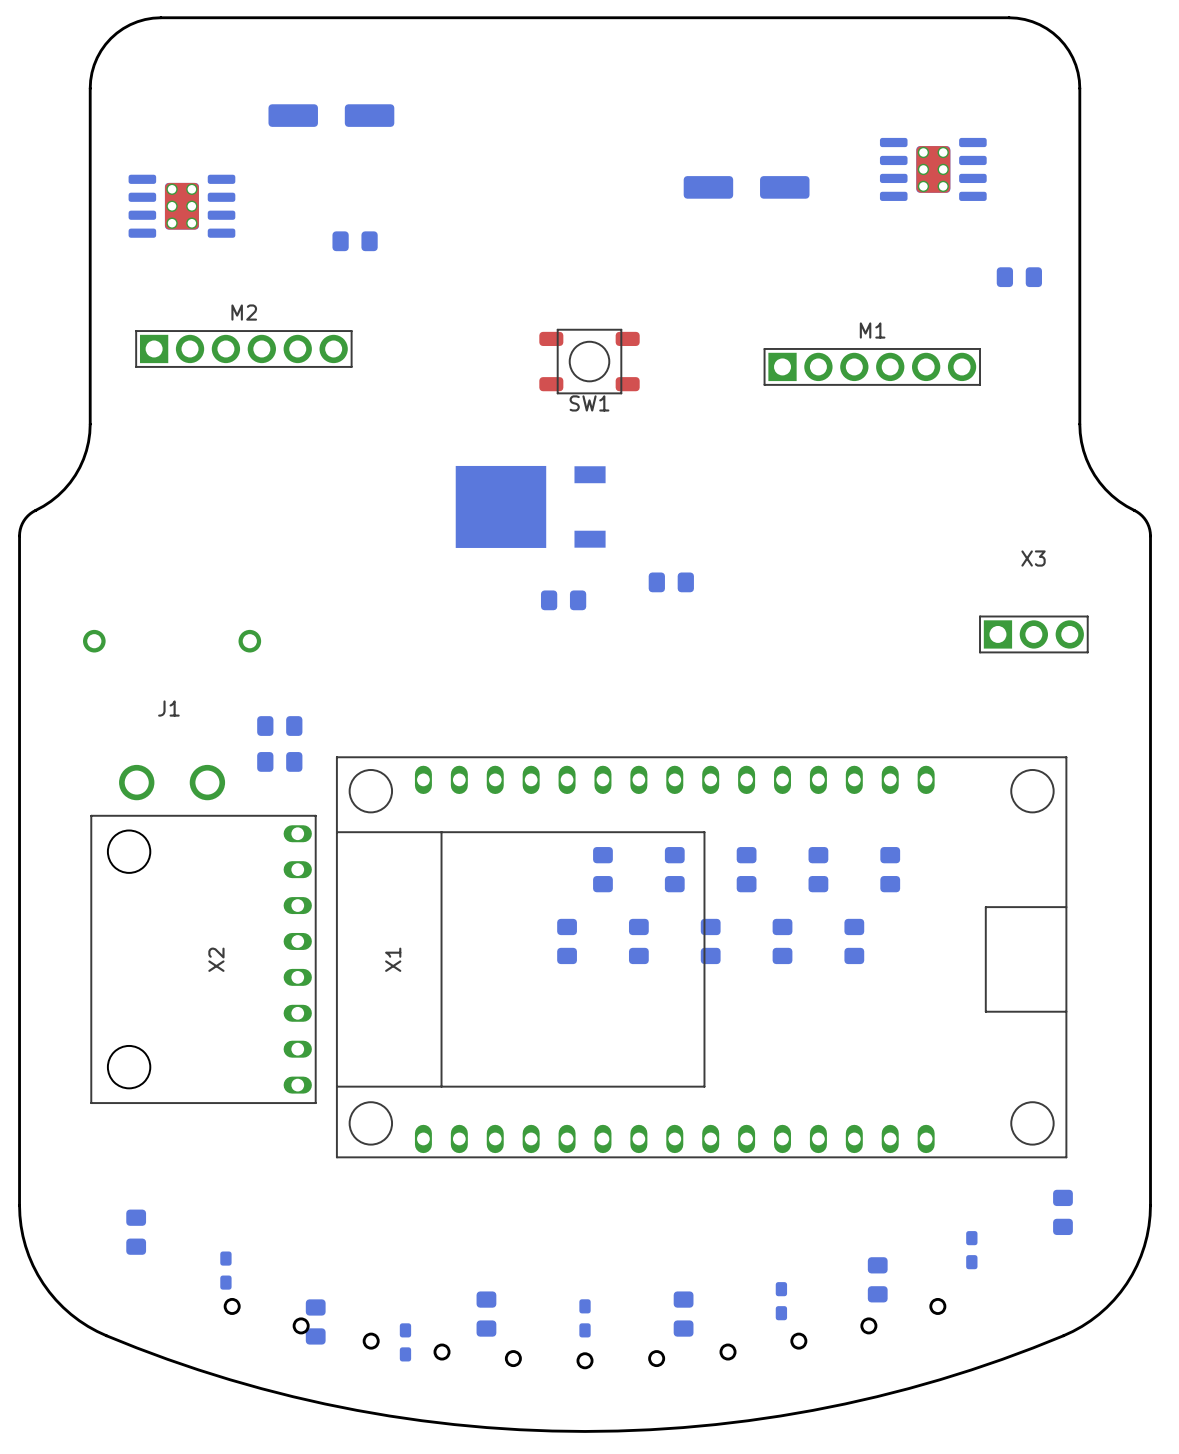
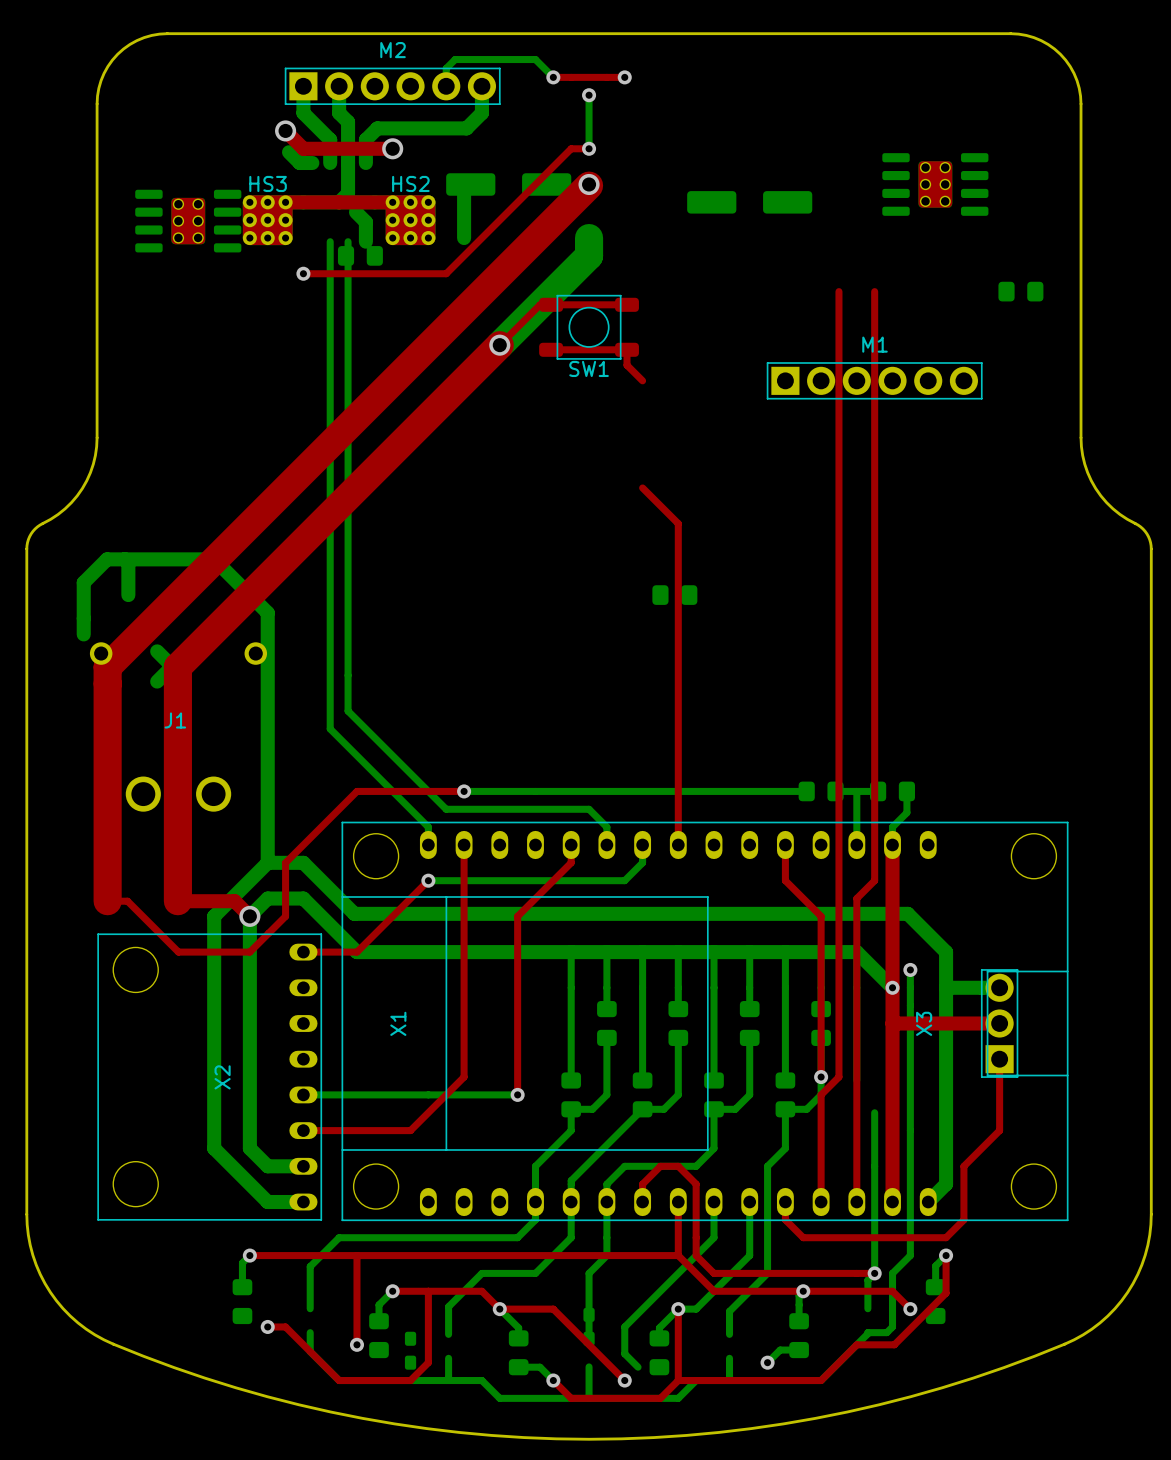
top track: none -> (553, 77) (624, 77)
bottom track: none -> (553, 77) (535, 59) (455, 59) (446, 68) (446, 86)
via: none -> (553, 77)
via: none -> (624, 77)
bottom track: none -> (303, 95) (303, 113) (330, 139) (330, 162)
bottom track: none -> (339, 95) (339, 113) (348, 122) (348, 193) (339, 202)
bottom track: none -> (481, 95) (481, 113) (466, 128) (377, 128) (365, 139) (365, 162)
bottom track: none -> (589, 95) (589, 148)
via: none -> (589, 95)
top track: none -> (285, 130) (303, 148) (392, 148)
via: none -> (285, 130)
part position: (331, 115) -> (508, 184)
via: none -> (392, 148)
top track: none -> (589, 148) (571, 148) (446, 273) (303, 273)
via: none -> (589, 148)
bottom track: none -> (289, 152) (299, 162) (312, 162)
bottom track: none -> (470, 184) (464, 191) (464, 238)
top track: none -> (589, 184) (107, 667) (107, 901) (127, 901) (178, 952) (249, 952) (285, 916) (285, 862) (356, 791) (464, 791)
via: none -> (589, 184)
top track: none -> (285, 202) (392, 202)
bottom track: none -> (356, 212) (365, 222) (365, 241)
HS3: none -> (267, 220)
HS2: none -> (410, 220)
bottom track: none -> (589, 238) (589, 255) (499, 345)
bottom track: none -> (330, 241) (330, 728) (428, 827) (428, 844)
bottom track: none -> (348, 241) (348, 711) (446, 809) (589, 809) (606, 827) (606, 844)
via: none -> (303, 273)
top track: none -> (838, 291) (838, 1077) (821, 1094) (821, 1202)
top track: none -> (874, 291) (874, 880) (856, 898) (856, 1202)
top track: none -> (627, 304) (540, 304) (177, 667) (177, 901) (234, 901) (249, 916)
via: none -> (499, 345)
top track: none -> (551, 349) (627, 349) (627, 365) (642, 380)
M2 position: (243, 348) -> (392, 86)
SW1 position: (589, 361) -> (589, 327)
top track: none -> (642, 487) (678, 523) (678, 844)
part: (530, 506) -> none
bottom track: none -> (124, 559) (128, 562) (128, 595)
part: (563, 600) -> none
bottom track: none -> (83, 634) (83, 582) (107, 559) (214, 559) (267, 612) (267, 862)
X3 rotation: 0° (1033, 634) -> 90° counterclockwise (999, 1023)
X3 position: (1033, 634) -> (999, 1023)
bottom track: none -> (157, 651) (177, 672)
bottom track: none -> (172, 666) (157, 681)
part: (279, 726) -> none
X1 footprint: [336, 756, 1068, 1159] -> [341, 821, 1069, 1222]
part: (279, 761) -> none
bottom track: none -> (464, 791) (806, 791)
via: none -> (464, 791)
part: none -> (821, 791)
bottom track: none -> (835, 791) (878, 791)
bottom track: none -> (856, 791) (856, 844)
part: none -> (892, 791)
bottom track: none -> (906, 791) (906, 812) (892, 827) (892, 844)
X2 footprint: [90, 814, 317, 1104] -> [97, 933, 323, 1221]
top track: none -> (464, 844) (464, 1077) (410, 1130) (303, 1130)
bottom track: none -> (642, 844) (642, 862) (624, 880) (428, 880)
top track: none -> (785, 844) (785, 880) (821, 916) (821, 1077)
top track: none -> (892, 844) (892, 1202)
top track: none -> (571, 845) (571, 862) (517, 916) (517, 1094)
bottom track: none -> (267, 862) (214, 916) (214, 1148) (267, 1202) (303, 1202)
bottom track: none -> (267, 862) (303, 862) (354, 913) (907, 913) (946, 952) (946, 1184) (928, 1202)
top track: none -> (428, 880) (356, 952) (303, 952)
via: none -> (428, 880)
part: (602, 869) -> none
part: (674, 869) -> none
part: (746, 869) -> none
part: (818, 869) -> none
part: (890, 869) -> none
via: none -> (249, 916)
bottom track: none -> (571, 952) (571, 1080)
part: (567, 941) -> none
bottom track: none -> (606, 952) (606, 1009)
bottom track: none -> (642, 952) (642, 1080)
part: (638, 941) -> none
bottom track: none -> (678, 952) (678, 1009)
bottom track: none -> (714, 952) (714, 1080)
part: (710, 941) -> none
bottom track: none -> (749, 952) (749, 1009)
bottom track: none -> (785, 952) (785, 1080)
part: (782, 941) -> none
bottom track: none -> (856, 952) (892, 987) (892, 1009)
bottom track: none -> (856, 952) (356, 952) (303, 898) (267, 898) (249, 916) (249, 1148) (267, 1166) (303, 1166)
part: (854, 941) -> none
bottom track: none -> (910, 969) (910, 1255) (892, 1273) (892, 1326) (886, 1332) (867, 1332) (821, 1380) (696, 1380) (678, 1398) (499, 1398) (481, 1380) (339, 1380) (310, 1351) (310, 1332)
via: none -> (910, 969)
via: none -> (892, 987)
bottom track: none -> (946, 987) (999, 987)
part: none -> (606, 1023)
part: none -> (678, 1023)
part: none -> (749, 1023)
part: none -> (821, 1023)
top track: none -> (892, 1023) (999, 1023)
bottom track: none -> (606, 1037) (606, 1094) (592, 1109) (571, 1109) (571, 1130) (535, 1166) (535, 1219) (517, 1237) (339, 1237) (310, 1266) (310, 1308)
bottom track: none -> (678, 1037) (678, 1094) (663, 1109) (642, 1109) (571, 1180) (571, 1237) (535, 1273) (481, 1273) (448, 1306) (448, 1334)
bottom track: none -> (749, 1037) (749, 1094) (735, 1109) (714, 1109) (714, 1148) (696, 1166) (624, 1166) (606, 1184) (606, 1255) (589, 1273) (589, 1342)
bottom track: none -> (821, 1037) (821, 1094) (806, 1109) (785, 1109) (785, 1148) (767, 1166) (767, 1273) (729, 1311) (729, 1334)
top track: none -> (999, 1059) (999, 1130) (963, 1166) (963, 1219) (946, 1237) (803, 1237) (785, 1219) (785, 1202)
via: none -> (821, 1077)
bottom track: none -> (303, 1094) (517, 1094)
via: none -> (517, 1094)
part: none -> (571, 1094)
part: none -> (642, 1094)
part: none -> (714, 1094)
part: none -> (785, 1094)
bottom track: none -> (874, 1112) (874, 1273) (867, 1280) (867, 1308)
top track: none -> (642, 1202) (642, 1184) (660, 1166) (678, 1166) (696, 1184) (696, 1255) (714, 1273) (874, 1273)
top track: none -> (678, 1202) (678, 1255)
bottom track: none -> (714, 1202) (714, 1237) (624, 1326) (624, 1353) (638, 1367)
bottom track: none -> (749, 1202) (749, 1255) (696, 1309) (678, 1309) (659, 1328) (659, 1338)
part: (1062, 1212) -> none
part: (136, 1232) -> none
top track: none -> (249, 1255) (678, 1255)
bottom track: none -> (249, 1255) (242, 1262) (242, 1287)
via: none -> (249, 1255)
top track: none -> (356, 1255) (356, 1344)
top track: none -> (678, 1255) (714, 1291) (892, 1291) (910, 1309)
top track: none -> (946, 1255) (946, 1293) (894, 1344) (856, 1344) (821, 1380) (678, 1380)
bottom track: none -> (946, 1255) (935, 1265) (935, 1287)
via: none -> (946, 1255)
part: (971, 1250) -> none
via: none -> (874, 1273)
part: (225, 1270) -> none
part: (877, 1279) -> none
top track: none -> (392, 1291) (481, 1291) (499, 1309) (553, 1309) (624, 1380)
bottom track: none -> (392, 1291) (379, 1304) (379, 1321)
via: none -> (392, 1291)
top track: none -> (428, 1291) (428, 1362) (410, 1380) (339, 1380) (285, 1326) (267, 1326)
bottom track: none -> (803, 1291) (799, 1295) (799, 1321)
via: none -> (803, 1291)
part: none -> (242, 1301)
part: none -> (935, 1301)
round board edge: [223, 1297, 241, 1315] -> none
round board edge: [929, 1297, 947, 1315] -> none
bottom track: none -> (499, 1309) (518, 1328) (518, 1338)
via: none -> (499, 1309)
top track: none -> (678, 1309) (678, 1380)
via: none -> (678, 1309)
via: none -> (910, 1309)
part: (781, 1301) -> none
part position: (486, 1314) -> (518, 1352)
part position: (683, 1314) -> (659, 1352)
round board edge: [292, 1317, 310, 1335] -> none
round board edge: [860, 1317, 878, 1335] -> none
via: none -> (267, 1326)
part: (315, 1321) -> none
part: none -> (379, 1335)
part: none -> (799, 1335)
round board edge: [362, 1332, 380, 1350] -> none
round board edge: [790, 1332, 808, 1350] -> none
via: none -> (356, 1344)
bottom track: none -> (799, 1350) (780, 1350) (767, 1362)
round board edge: [433, 1343, 451, 1361] -> none
round board edge: [719, 1343, 737, 1361] -> none
bottom track: none -> (448, 1358) (448, 1378) (446, 1380)
round board edge: [504, 1350, 522, 1368] -> none
round board edge: [648, 1350, 666, 1368] -> none
bottom track: none -> (729, 1358) (729, 1378) (731, 1380)
round board edge: [576, 1352, 594, 1370] -> none
via: none -> (767, 1362)
bottom track: none -> (518, 1367) (540, 1367) (553, 1380)
bottom track: none -> (589, 1366) (589, 1398)
top track: none -> (553, 1380) (571, 1398) (660, 1398) (678, 1380)
via: none -> (553, 1380)
via: none -> (624, 1380)

